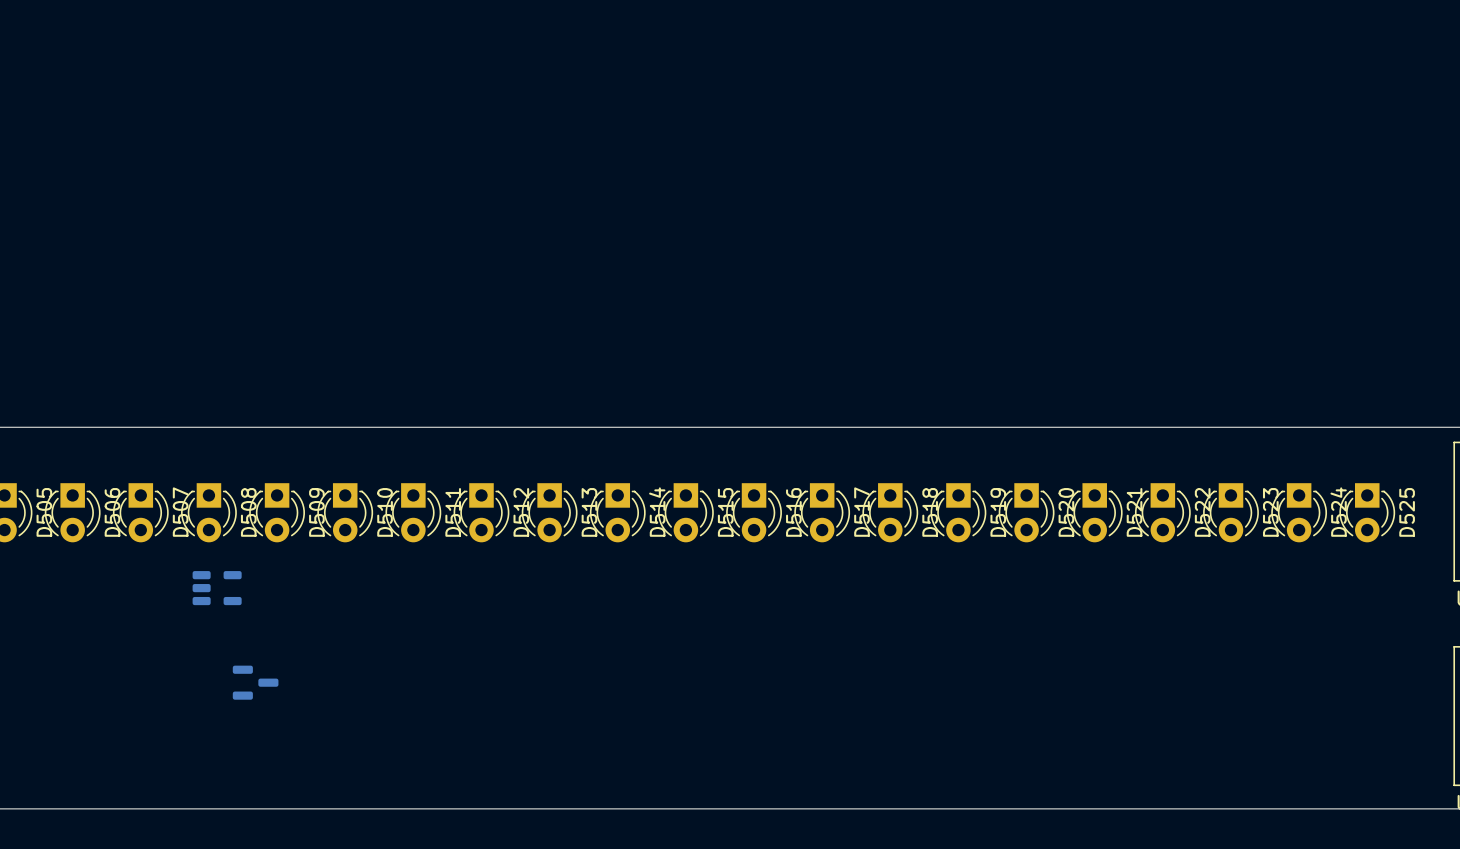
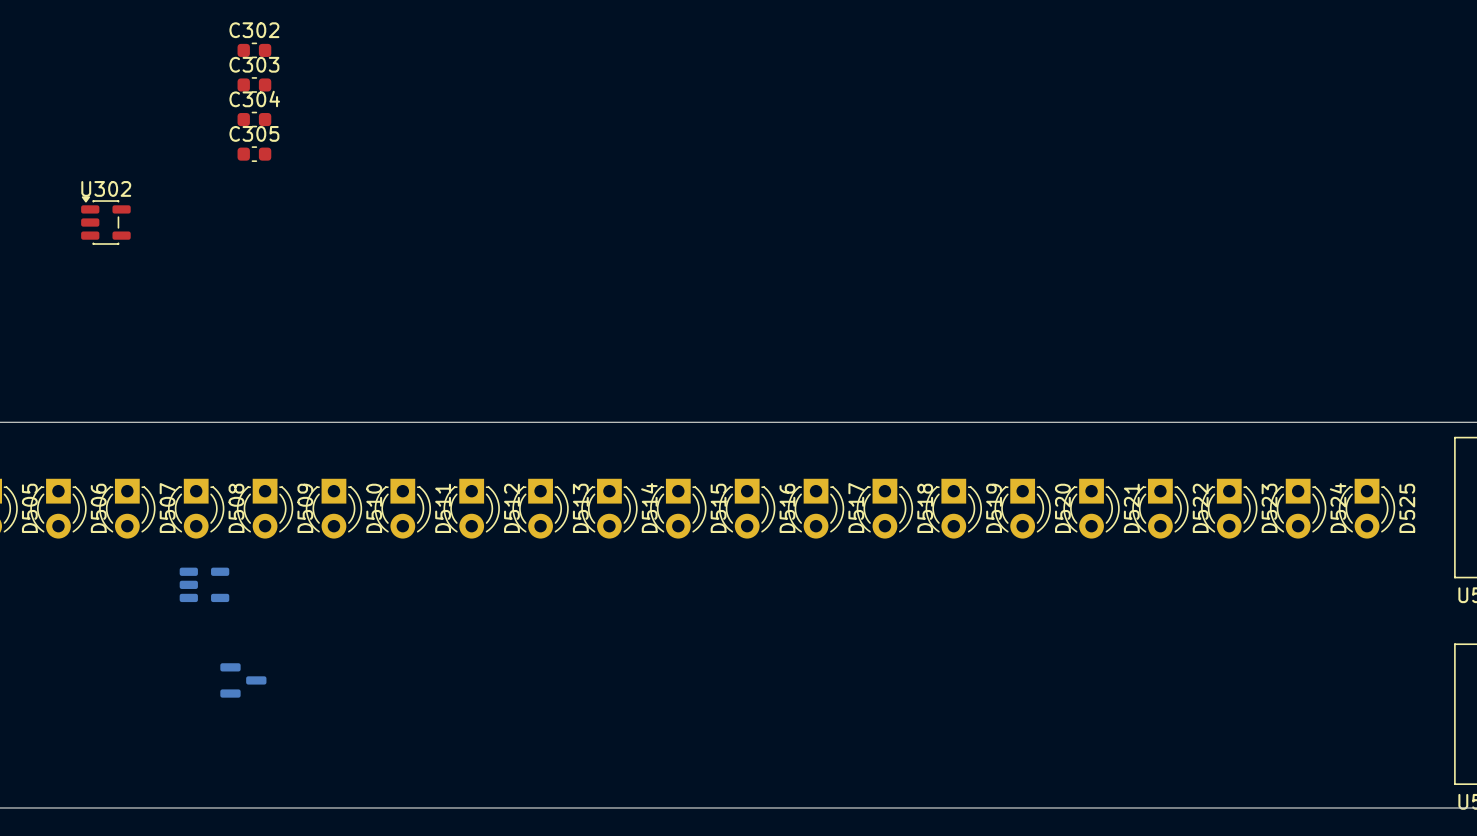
C302: none -> (254, 50)
C303: none -> (254, 84)
C304: none -> (254, 119)
C305: none -> (254, 154)
U302: none -> (105, 220)

